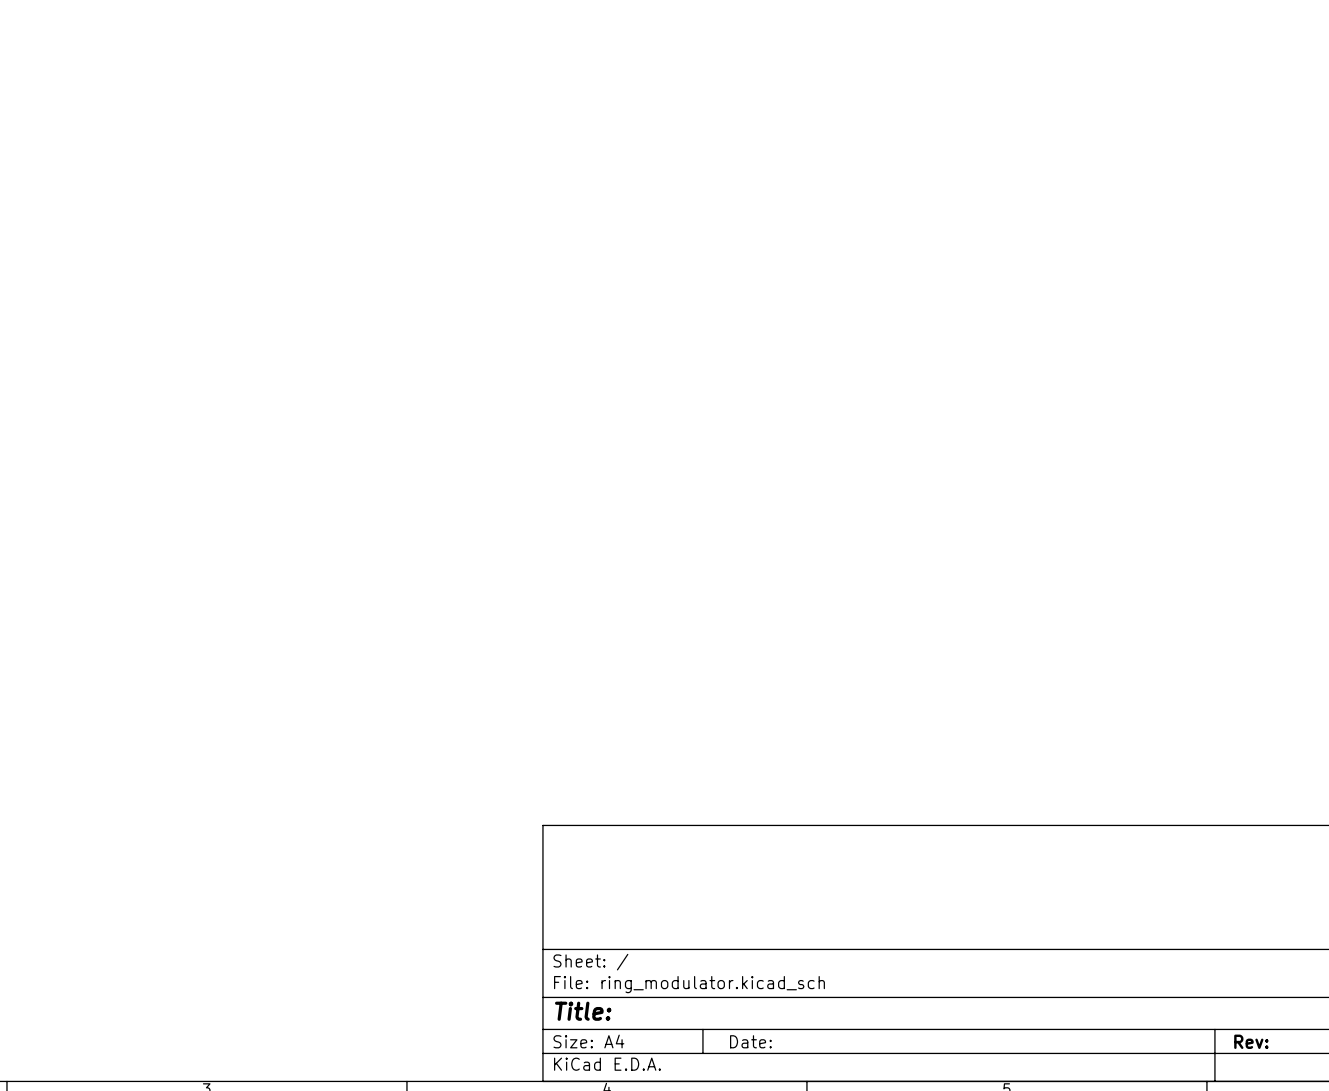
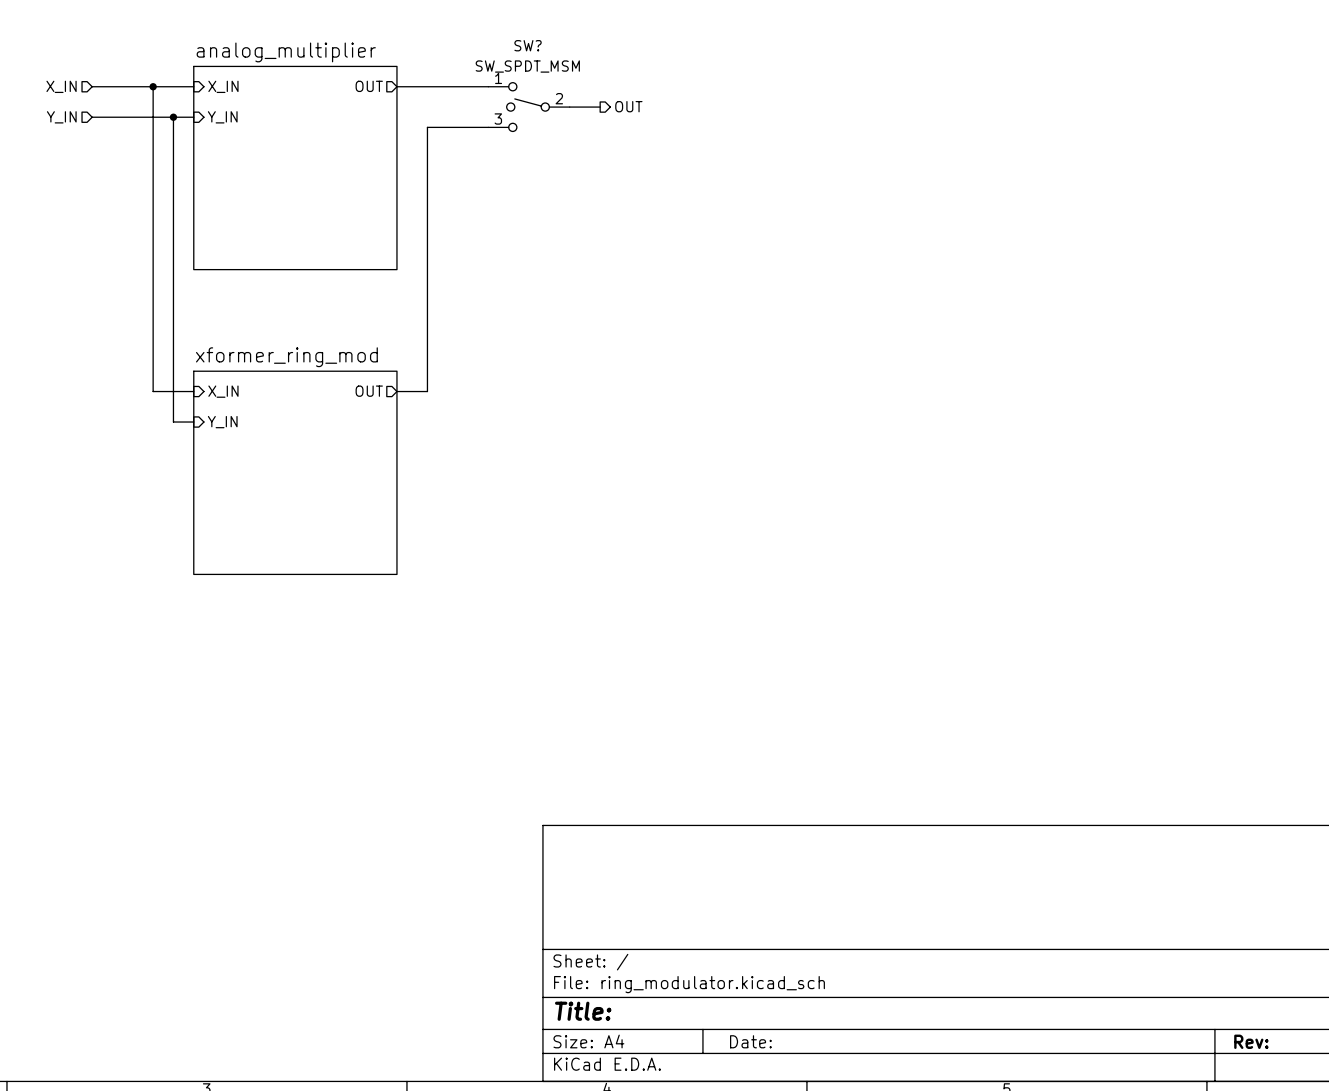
hierarchical label: none -> X_IN (61, 86)
wire: none -> (92, 86) (193, 86)
wire: none -> (153, 86) (153, 391) (193, 391)
junction: none -> (153, 86)
sheet pin: none -> X_IN (223, 86)
sheet pin: none -> OUT (369, 86)
wire: none -> (396, 86) (488, 86)
hierarchical label: none -> OUT (628, 106)
SW?: none -> SW_SPDT_MSM (529, 107)
wire: none -> (569, 107) (600, 107)
hierarchical label: none -> Y_IN (61, 117)
wire: none -> (92, 117) (193, 117)
wire: none -> (173, 117) (173, 422) (193, 422)
junction: none -> (173, 117)
sheet pin: none -> Y_IN (222, 117)
wire: none -> (488, 127) (427, 127) (427, 391) (396, 391)
sheet analog_multiplier: none -> (295, 168)
sheet pin: none -> X_IN (223, 391)
sheet pin: none -> OUT (369, 391)
sheet pin: none -> Y_IN (222, 422)
sheet xformer_ring_mod: none -> (295, 472)

